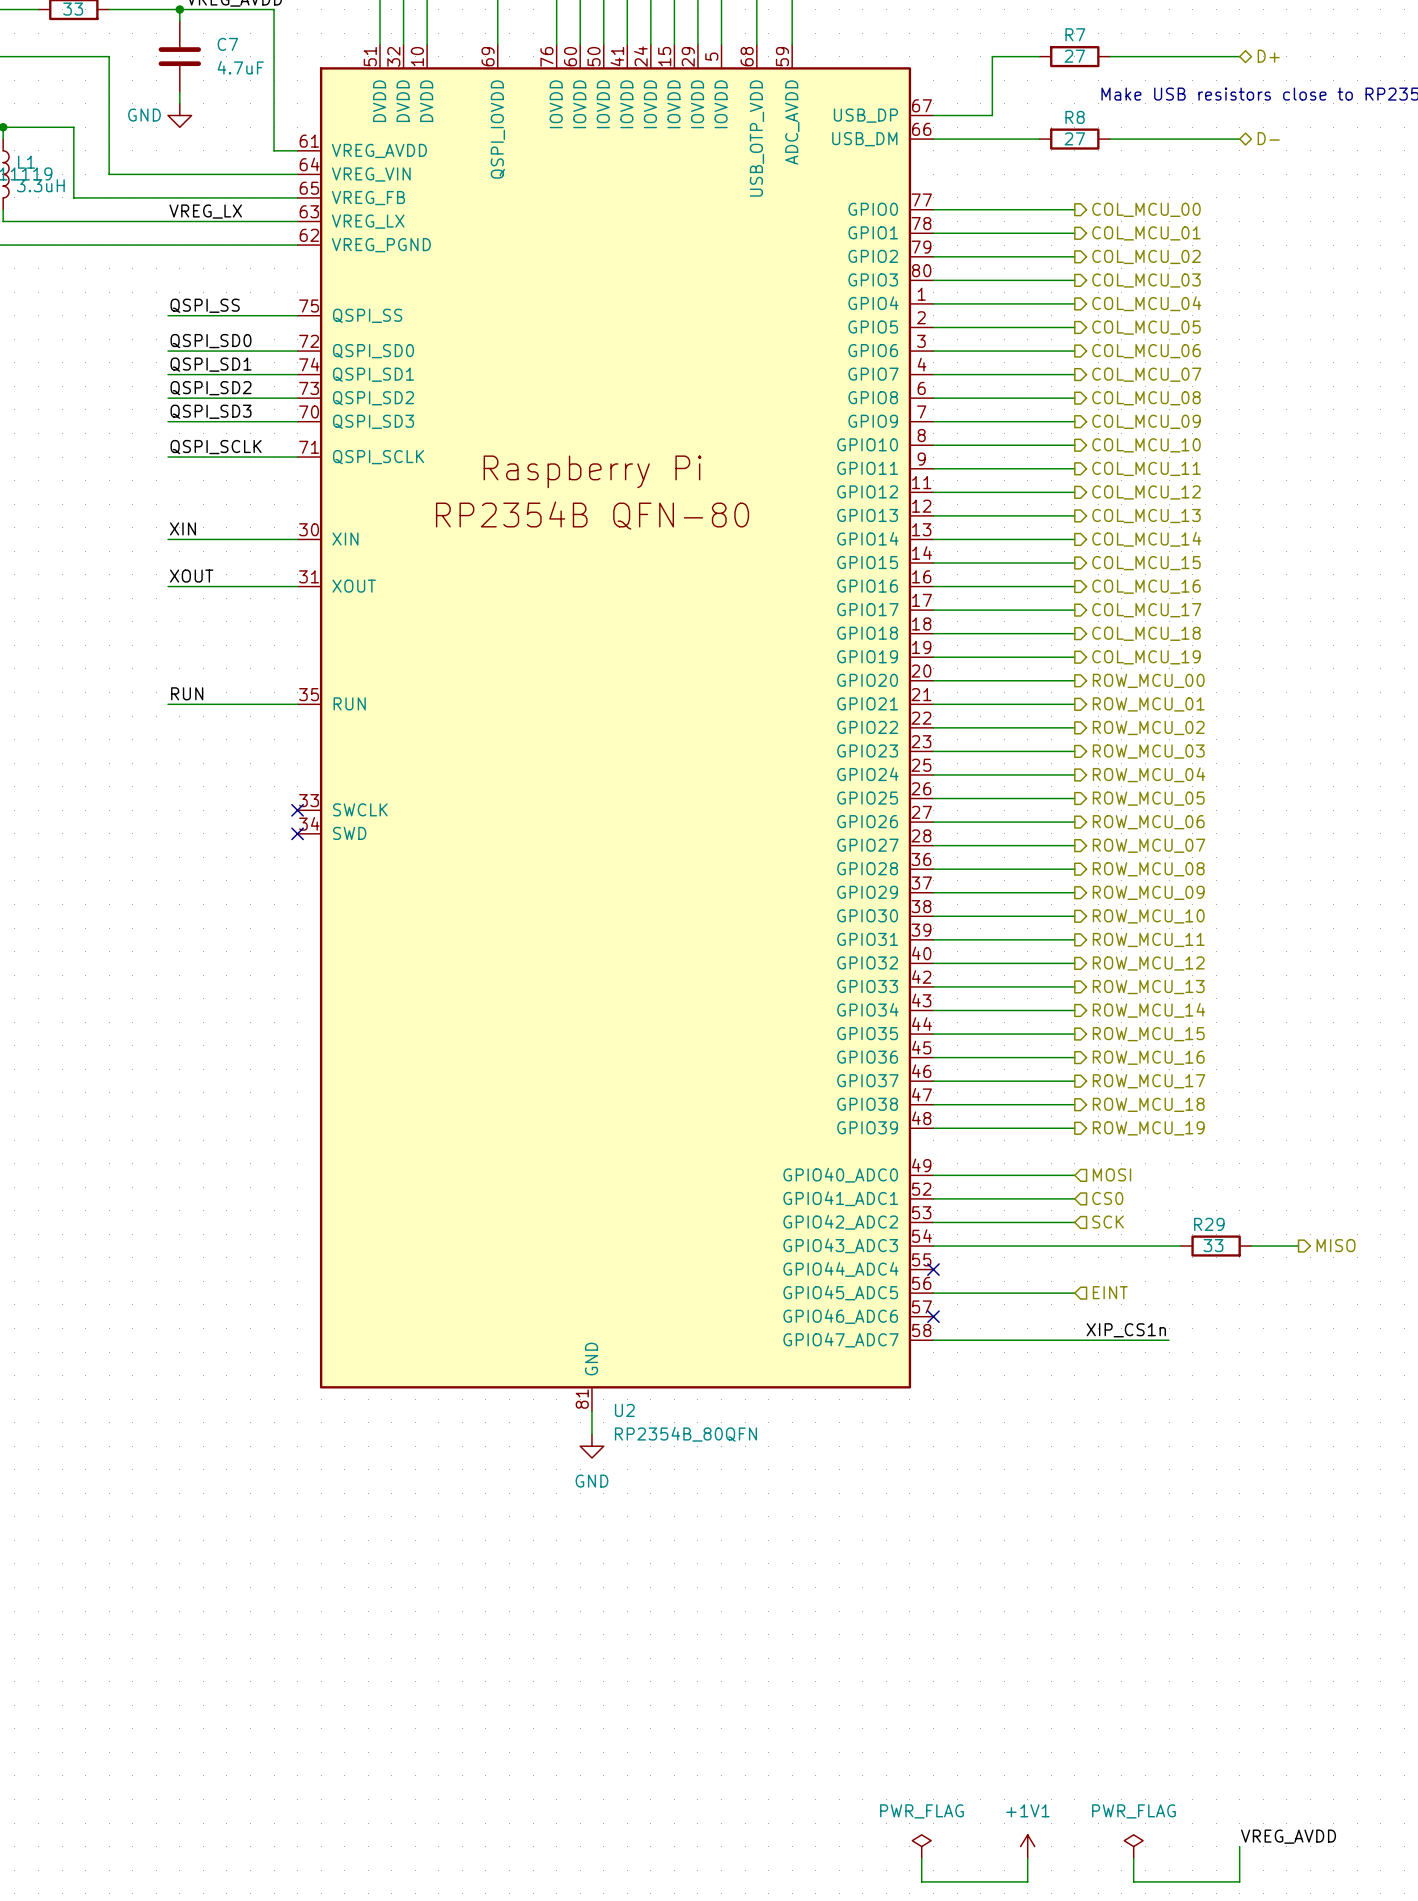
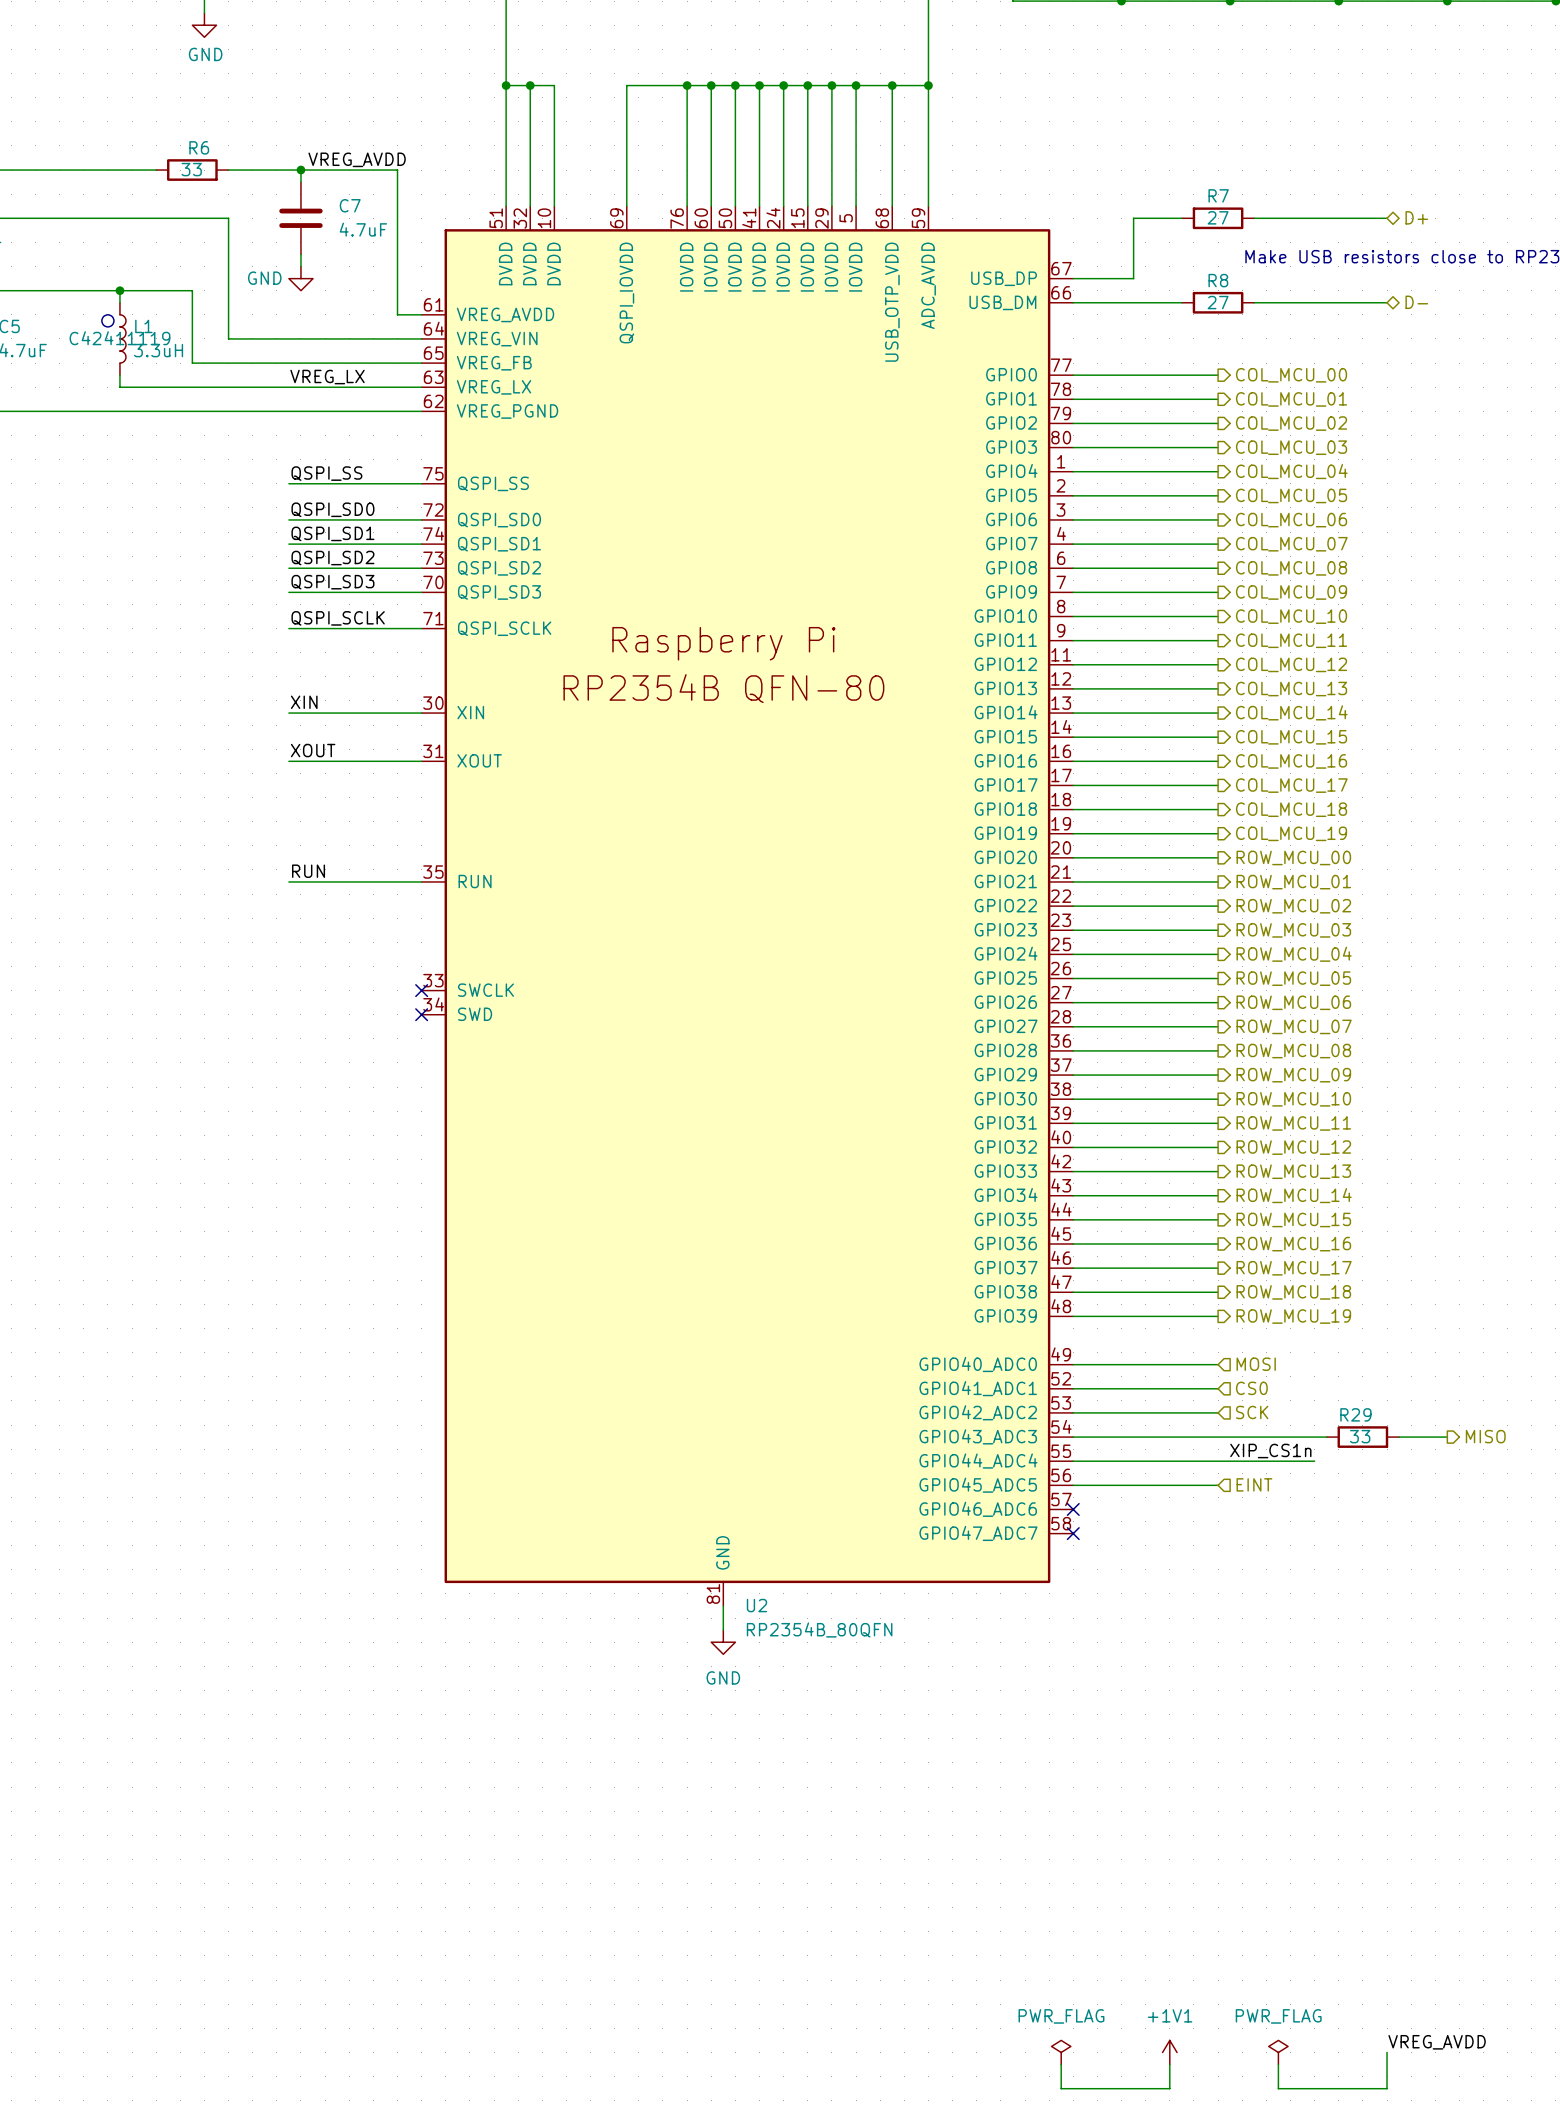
no-connect mark: (933, 1269) -> none
label position: XIP_CS1n (1126, 1330) -> XIP_CS1n (1270, 1451)
wire: (933, 1340) (1169, 1340) -> (1073, 1461) (1314, 1461)
no-connect mark: none -> (1073, 1533)

